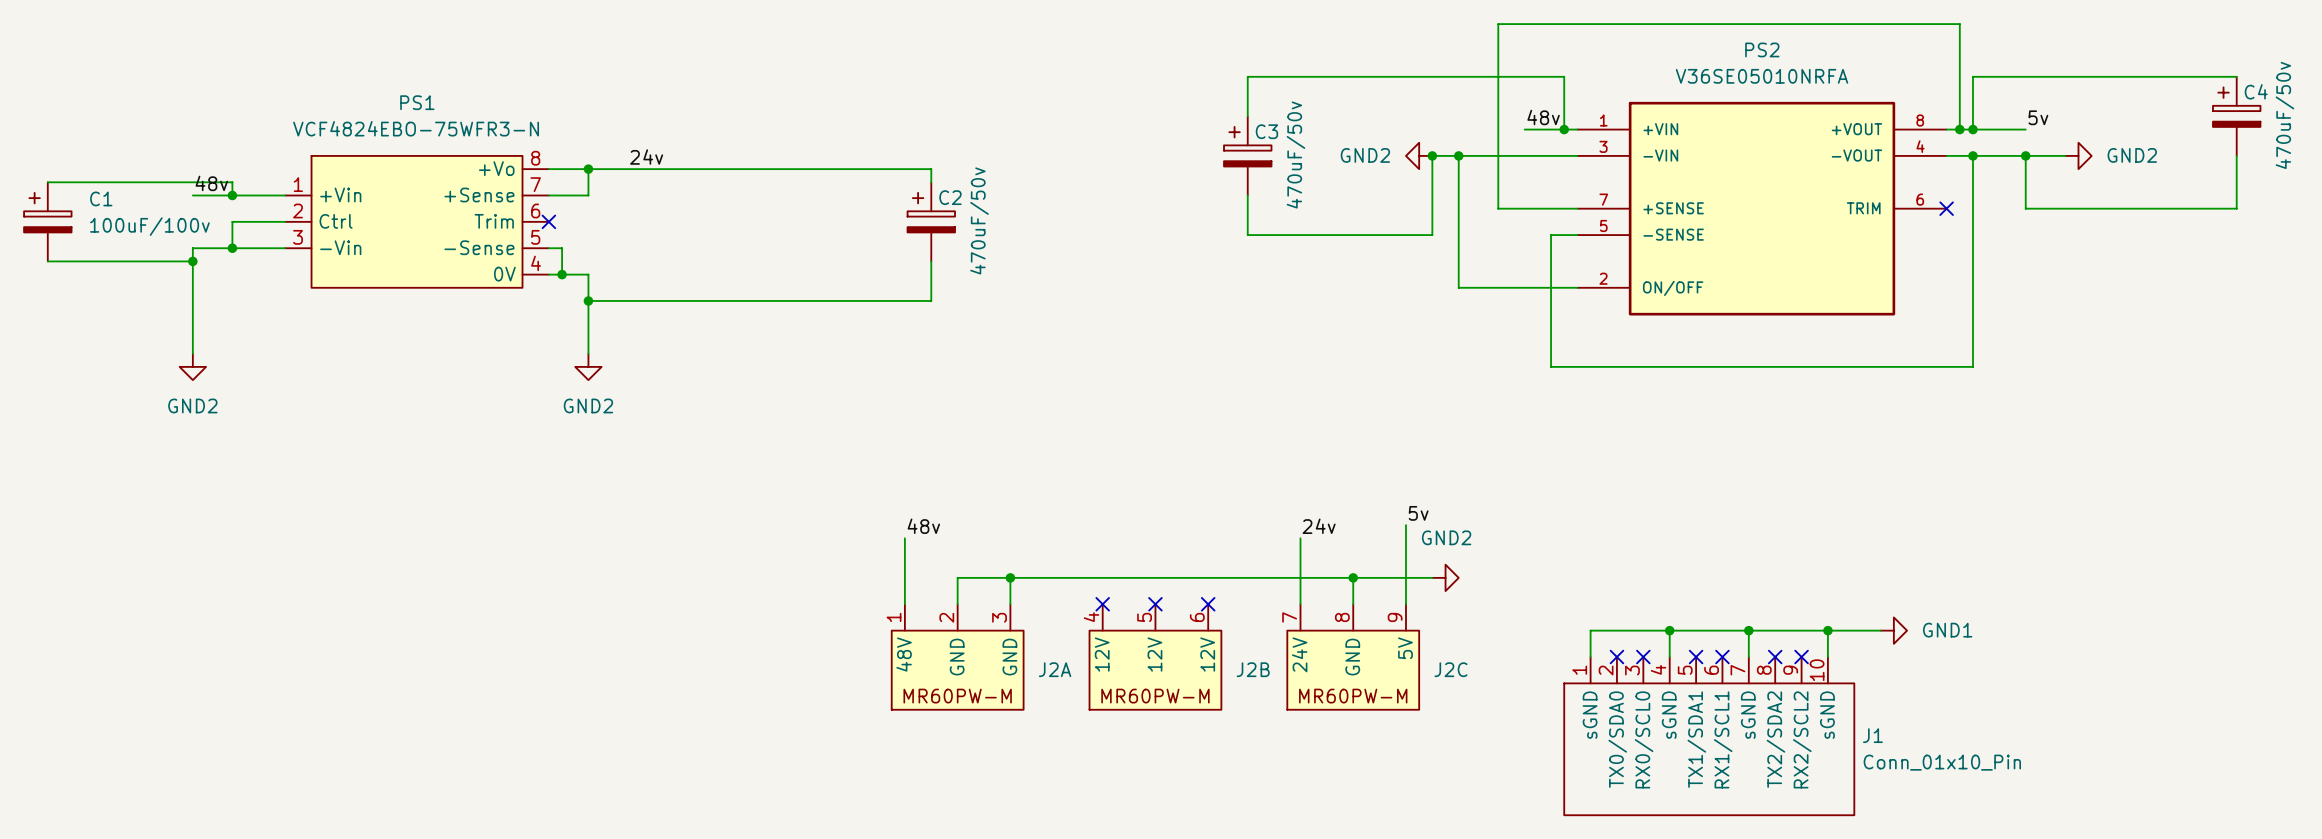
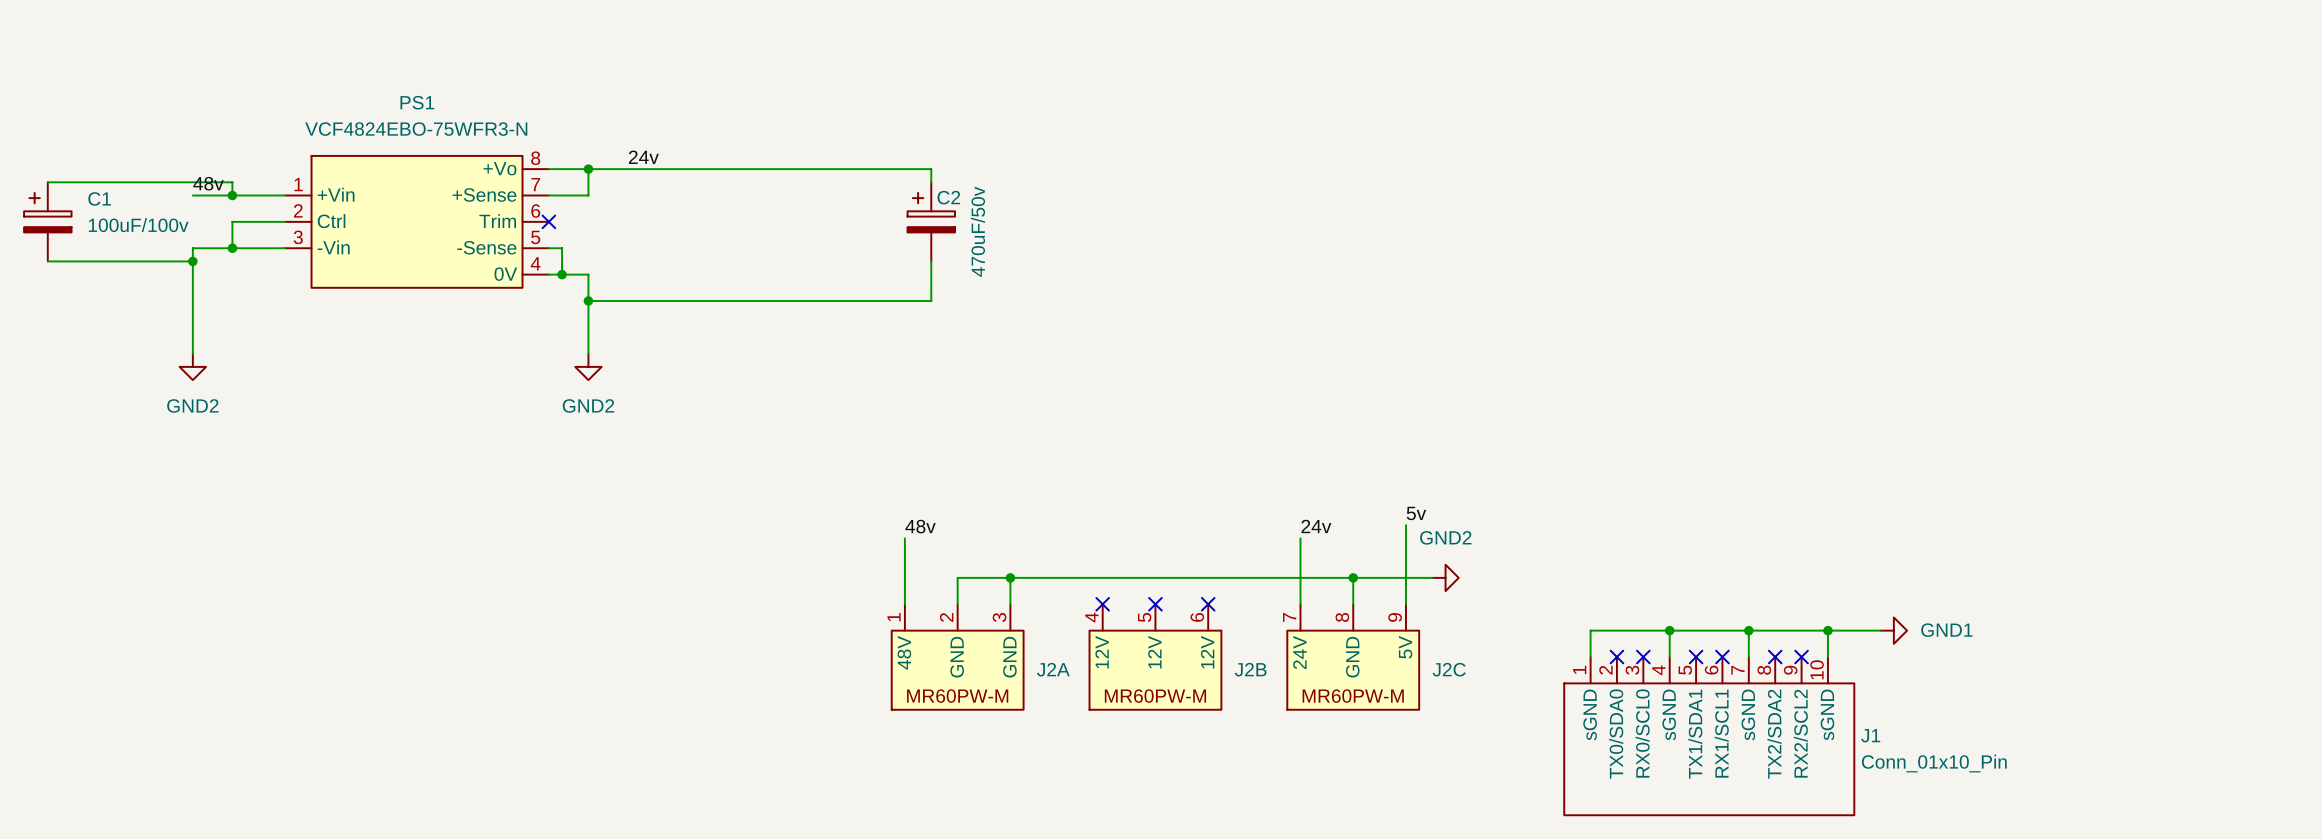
wire: (2236, 76) (1972, 76) (1972, 129) -> none
wire: (1247, 116) (1247, 76) (1564, 76) (1564, 129) -> none
C4: 470uF/50v (2236, 116) -> none
label: 48v (1543, 117) -> none
label: 5v (2038, 117) -> none
wire: (1524, 129) (1577, 129) -> none
junction: (1564, 129) -> none
wire: (1946, 129) (2025, 129) -> none
wire: (1959, 129) (1959, 24) (1498, 24) (1498, 208) (1577, 208) -> none
junction: (1959, 129) -> none
junction: (1972, 129) -> none
C3: 470uF/50v (1247, 155) -> none
power symbol: GND2 (1419, 155) -> none
junction: (1432, 155) -> none
wire: (1458, 155) (1458, 287) (1577, 287) -> none
junction: (1458, 155) -> none
wire: (1577, 155) (1432, 155) (1432, 235) (1247, 235) (1247, 195) -> none
wire: (1946, 155) (2065, 155) -> none
wire: (1972, 155) (1972, 366) (1551, 366) (1551, 235) (1577, 235) -> none
junction: (1972, 155) -> none
wire: (2025, 155) (2025, 208) (2236, 208) (2236, 155) -> none
junction: (2025, 155) -> none
power symbol: GND2 (2078, 155) -> none
PS2: V36SE05010NRFA (1762, 208) -> none
no-connect mark: (1946, 208) -> none

